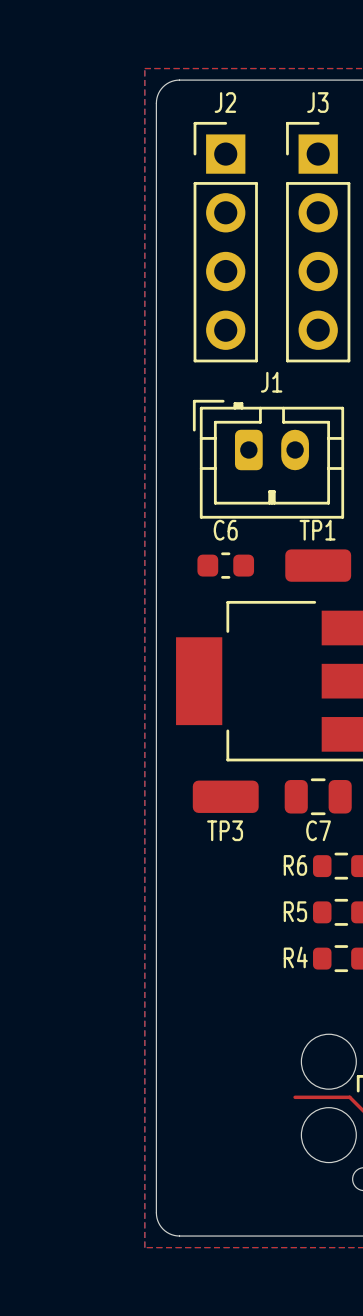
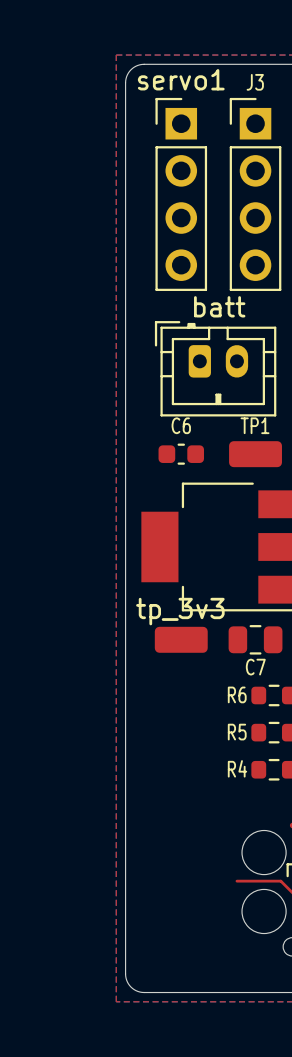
J2 name: J2 (225, 102) -> servo1 (181, 79)
J1 name: J1 (271, 382) -> batt (219, 306)
TP3 name: TP3 (225, 830) -> tp_3v3 (180, 611)

